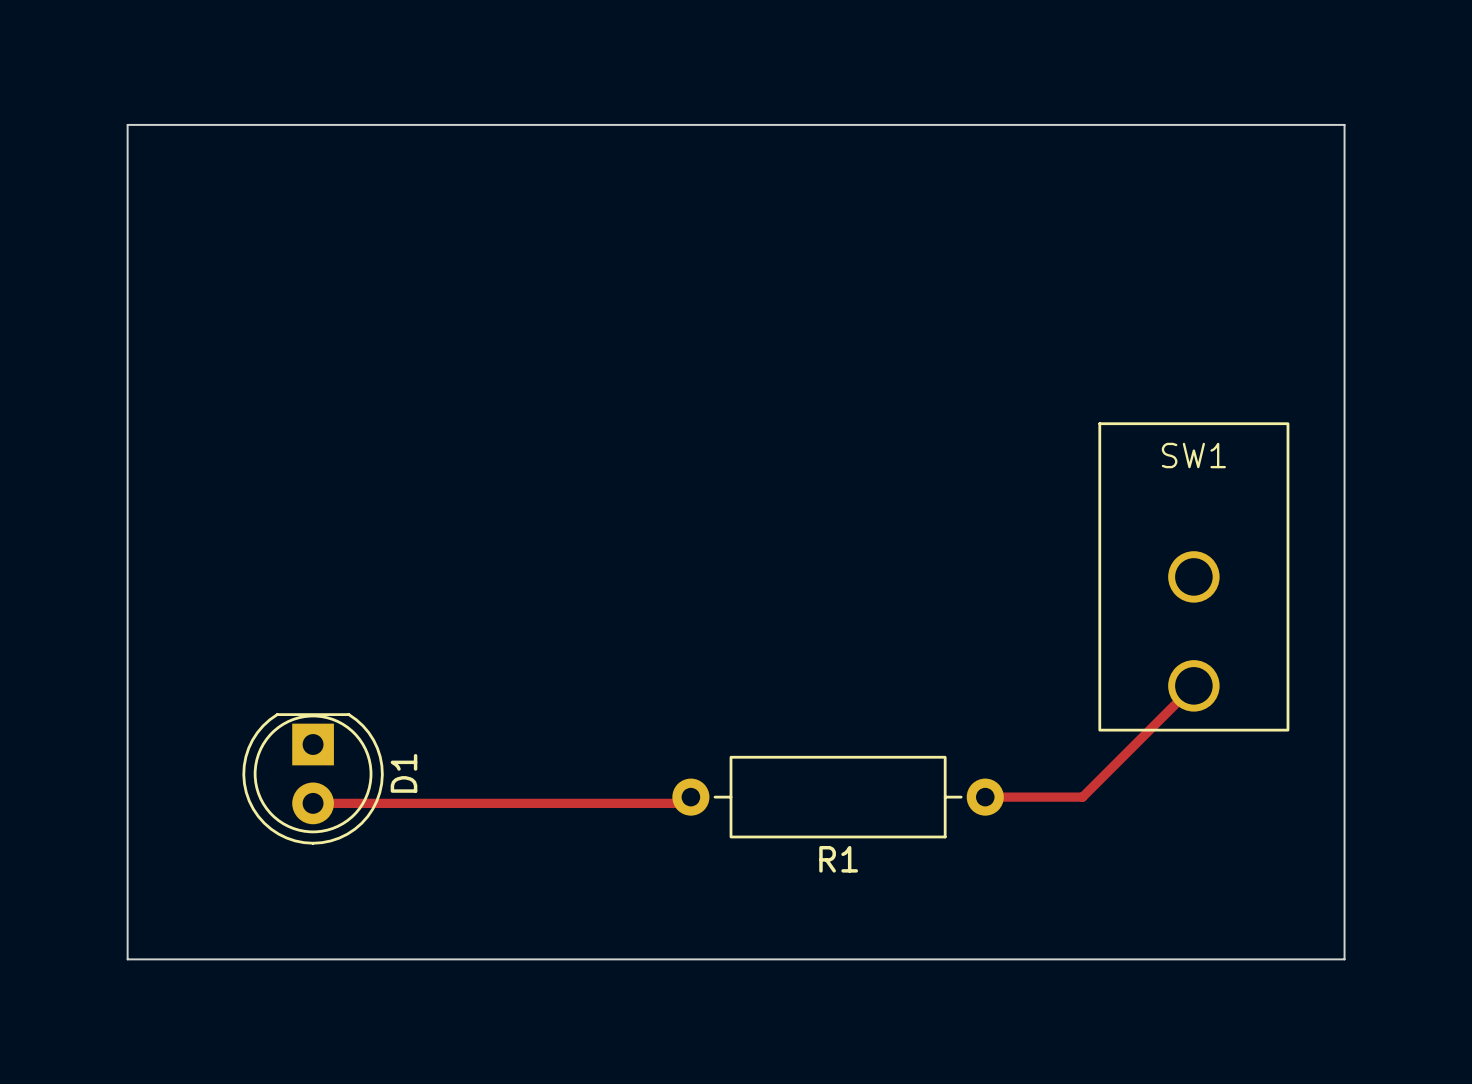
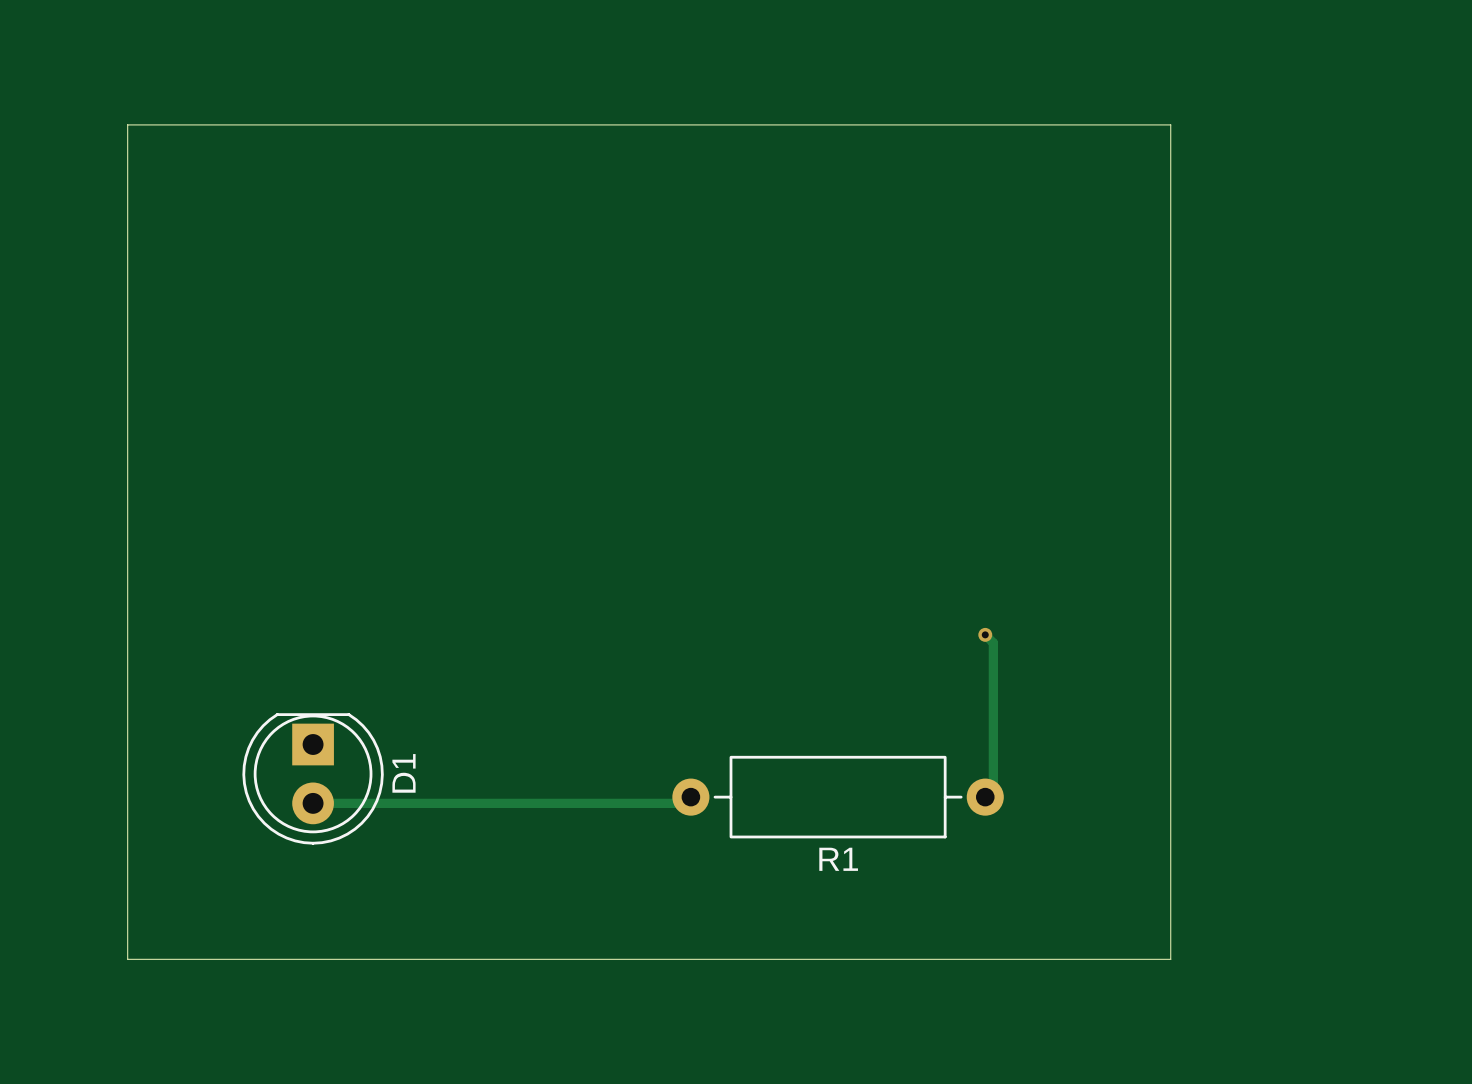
board edge: (1170, 124) (1344, 124) (1344, 959) (1170, 959) -> (1170, 124) (1170, 959)
SW1: (1193, 576) -> none
via: none -> (985, 634)
track: (1193, 685) (1082, 797) (985, 797) -> (985, 634) (993, 642) (993, 789) (985, 797)

